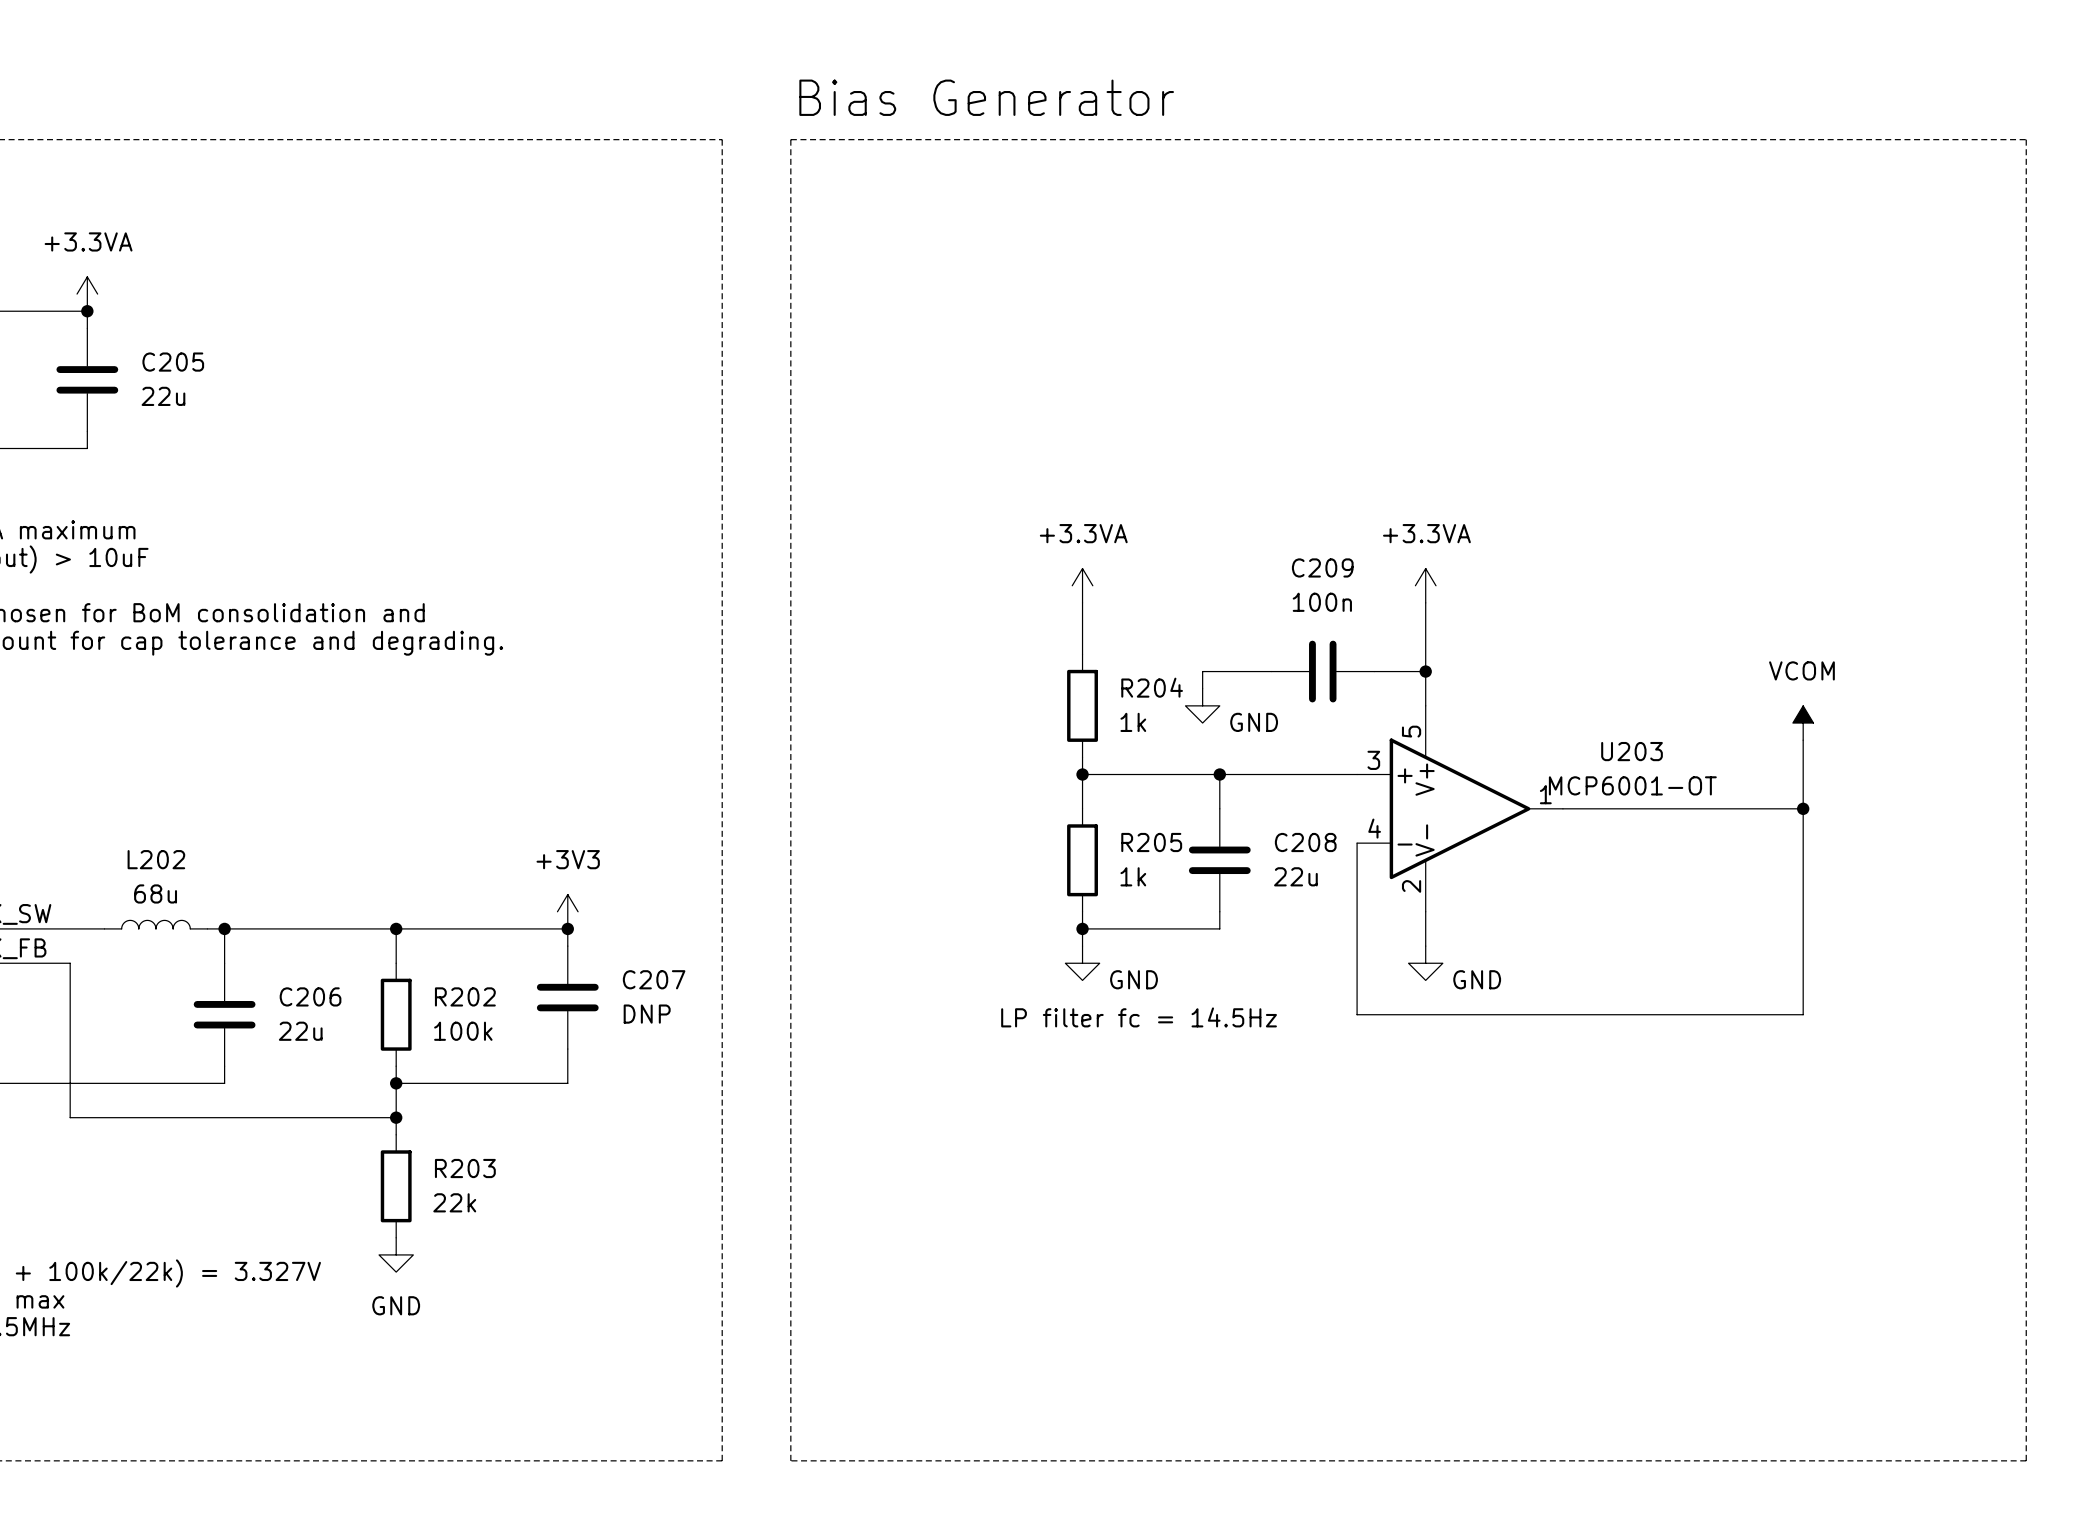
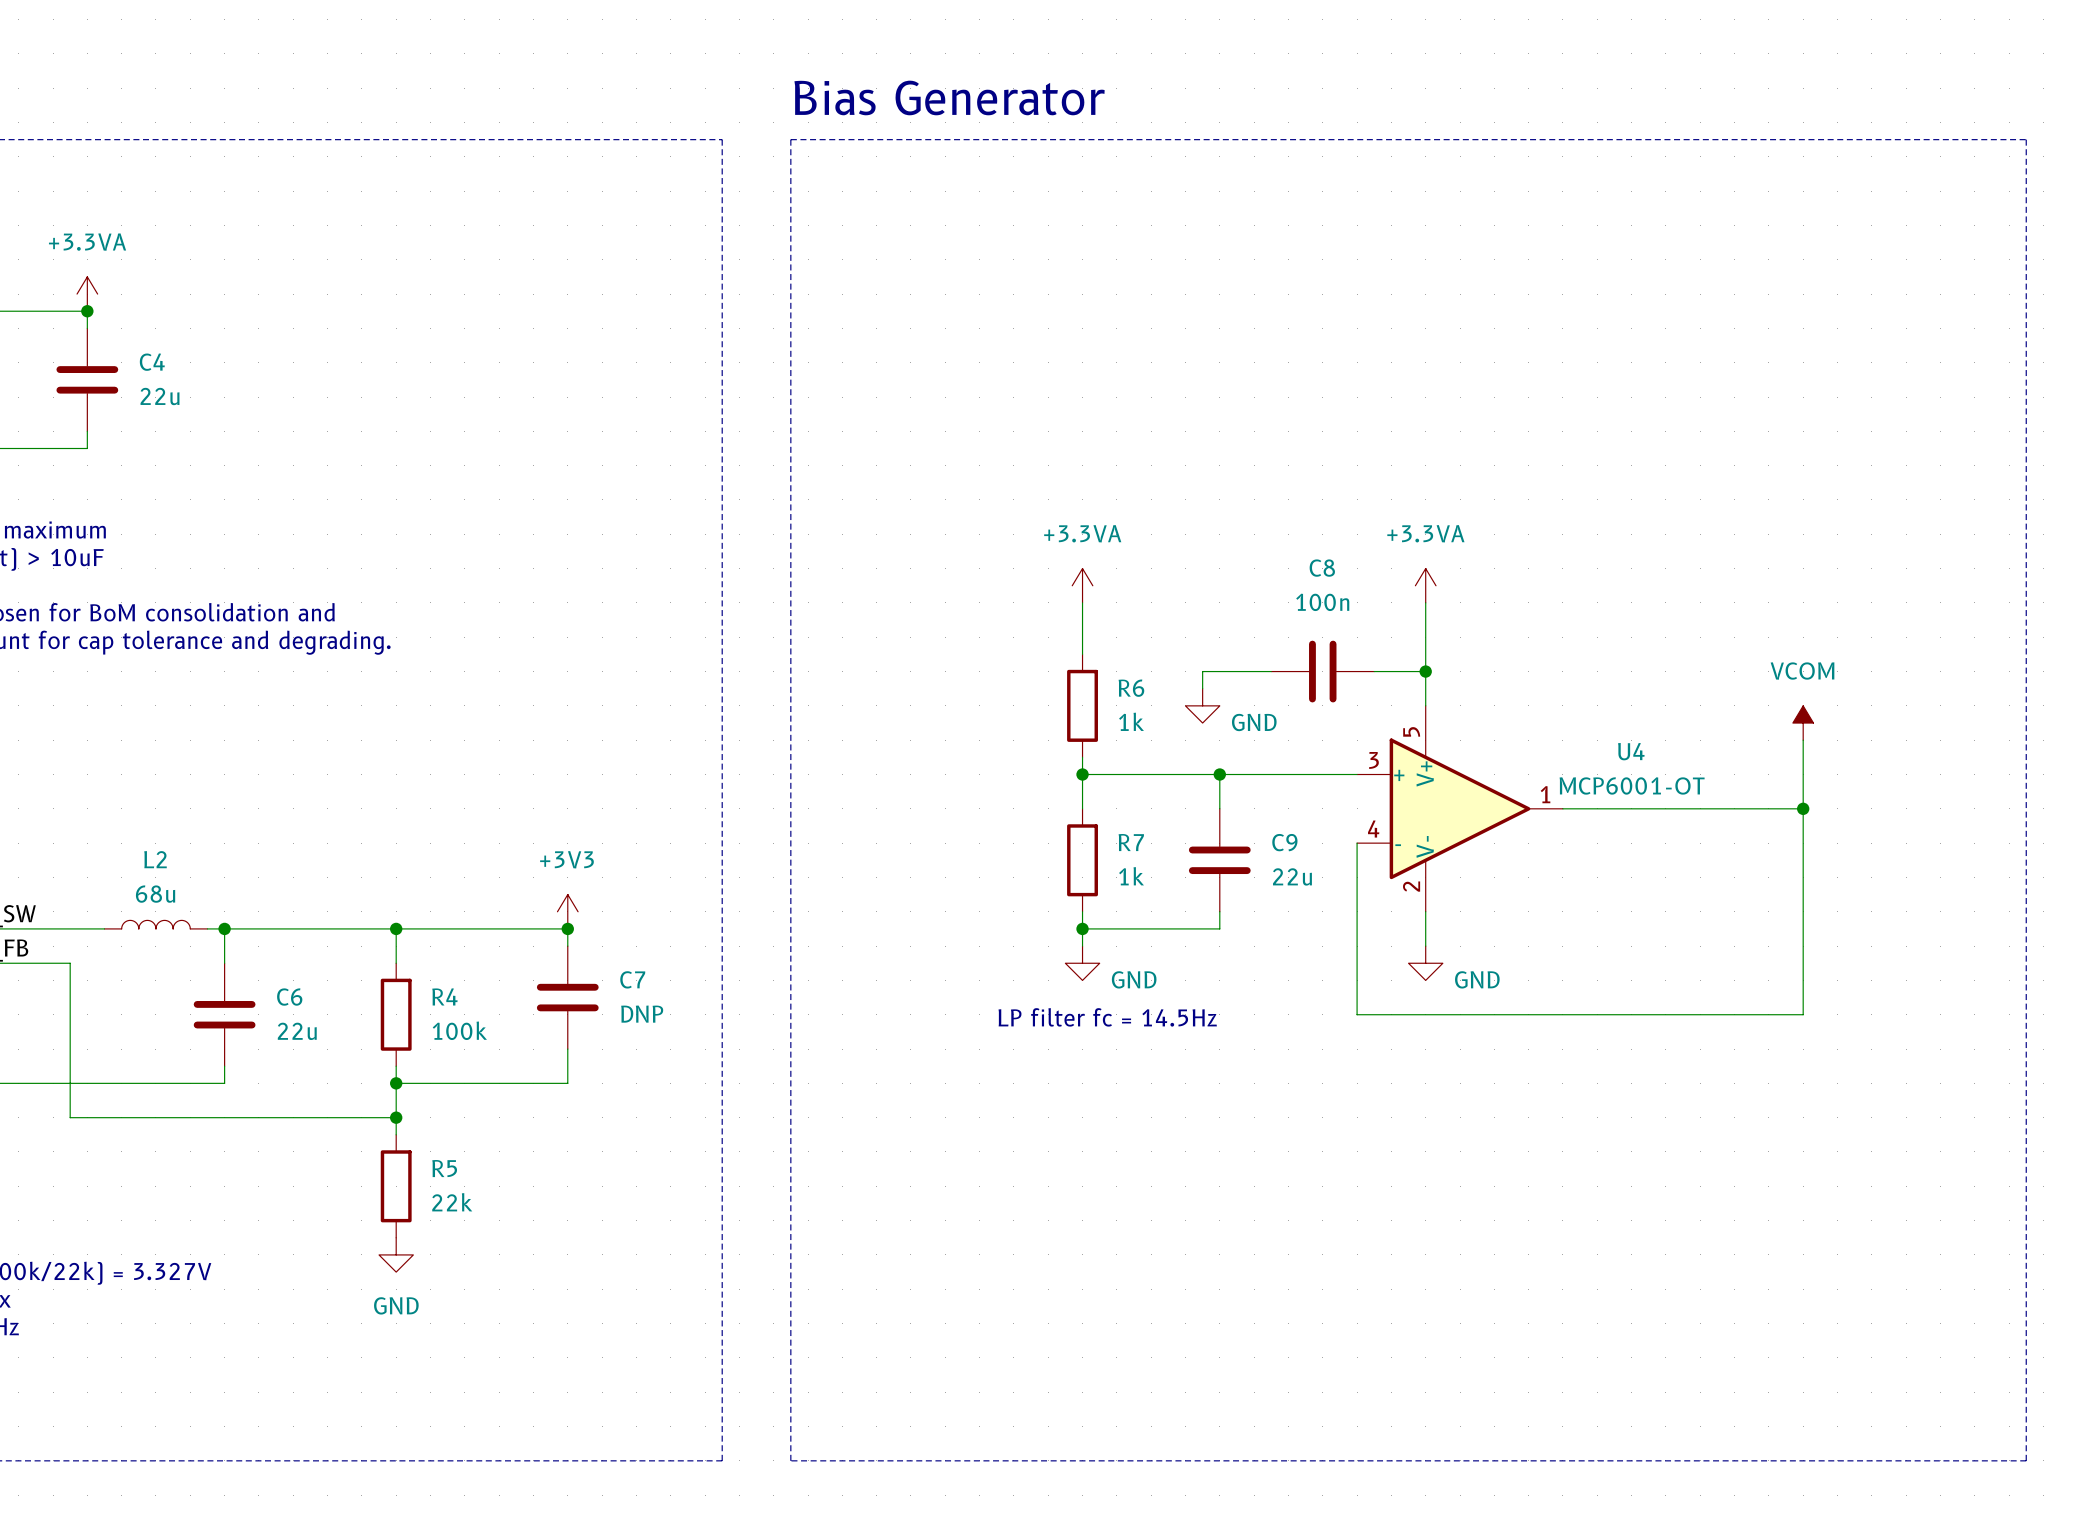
C205 name: C205 (173, 362) -> C4 (152, 362)
C209 name: C209 (1322, 567) -> C8 (1322, 568)
R204 name: R204 (1152, 687) -> R6 (1131, 688)
U203 name: U203 (1632, 751) -> U4 (1631, 751)
R205 name: R205 (1151, 842) -> R7 (1131, 842)
C208 name: C208 (1305, 842) -> C9 (1284, 842)
L202 name: L202 (156, 859) -> L2 (155, 859)
C207 name: C207 (654, 979) -> C7 (632, 979)
C206 name: C206 (310, 996) -> C6 (289, 997)
R202 name: R202 (465, 996) -> R4 (444, 996)
R203 name: R203 (465, 1168) -> R5 (444, 1168)

